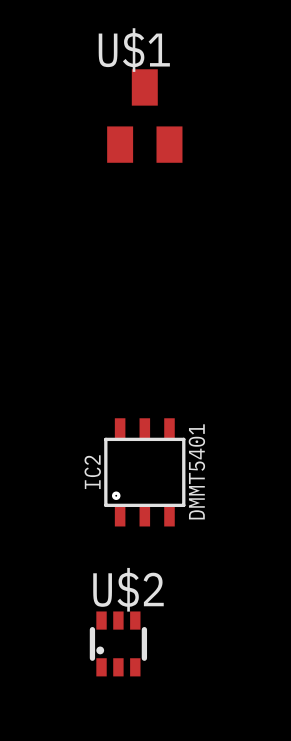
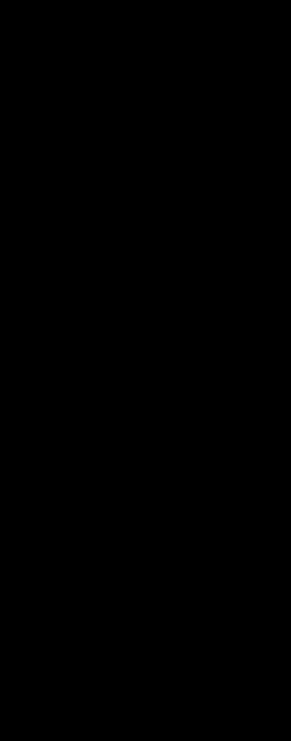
U$1: (144, 116) -> none
IC2: DMMT5401 (144, 472) -> none
U$2: (118, 643) -> none

